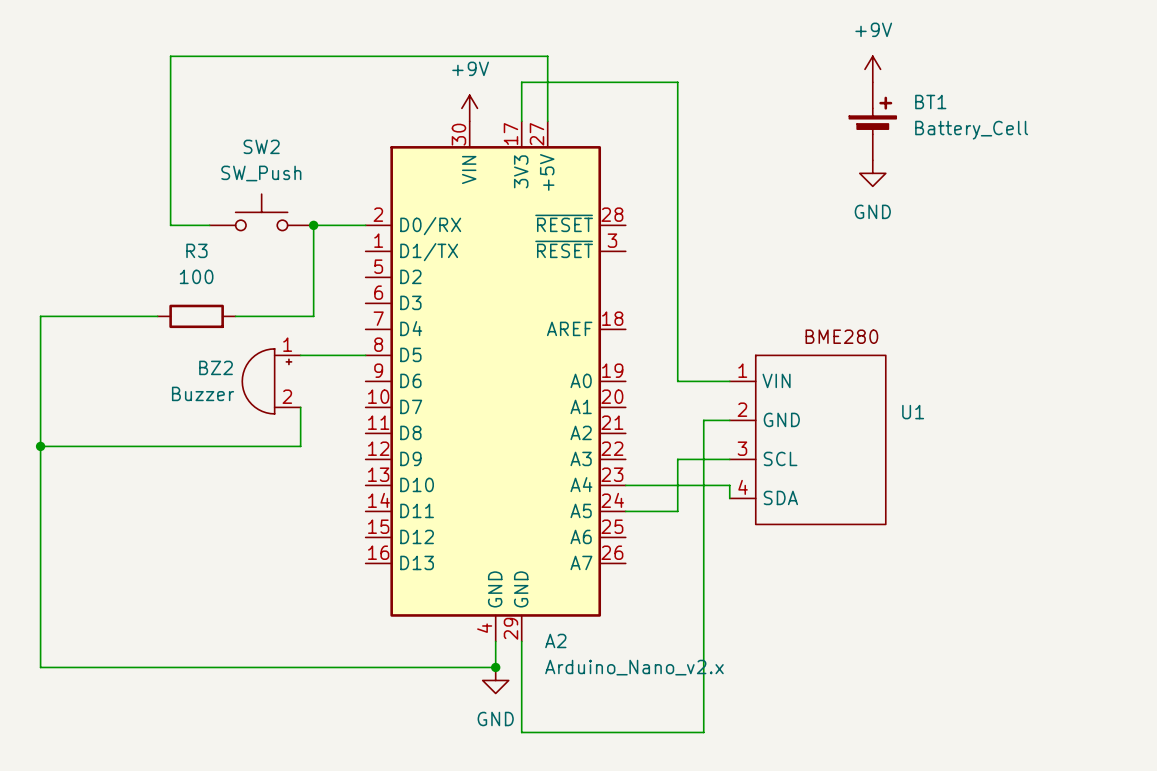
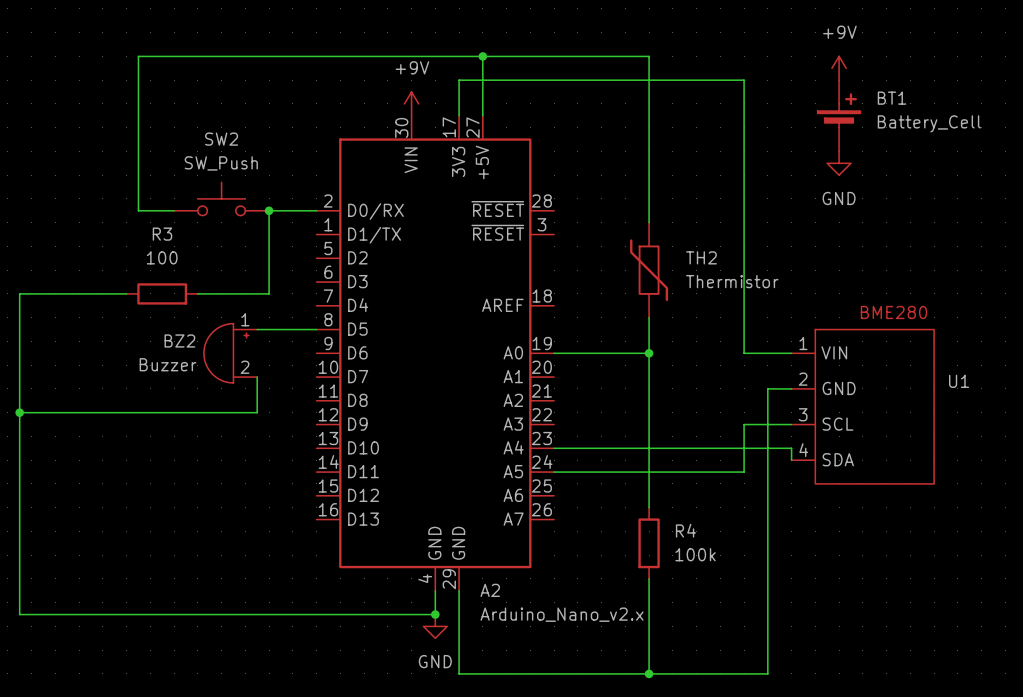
wire: none -> (482, 56) (649, 56) (649, 222)
junction: none -> (482, 56)
power symbol position: +9V (872, 69) -> +9V (839, 68)
wire: (677, 82) (677, 381) -> (601, 80) (744, 80) (744, 353) (791, 353)
BT1 position: (872, 121) -> (839, 115)
power symbol position: GND (872, 173) -> GND (839, 163)
TH2: none -> Thermistor (649, 270)
wire: none -> (649, 317) (649, 448) (791, 448) (791, 460)
wire: none -> (554, 353) (601, 353)
junction: none -> (649, 353)
wire: (729, 420) (703, 420) (703, 732) -> (791, 388) (767, 388) (767, 673) (625, 673)
U1 position: (807, 439) -> (862, 406)
wire: (729, 459) (677, 459) (677, 511) -> (791, 424) (744, 424) (744, 472) (601, 472)
wire: none -> (649, 460) (649, 507)
R4: none -> 100k (649, 543)
wire: none -> (649, 578) (649, 673)
junction: none -> (649, 673)

